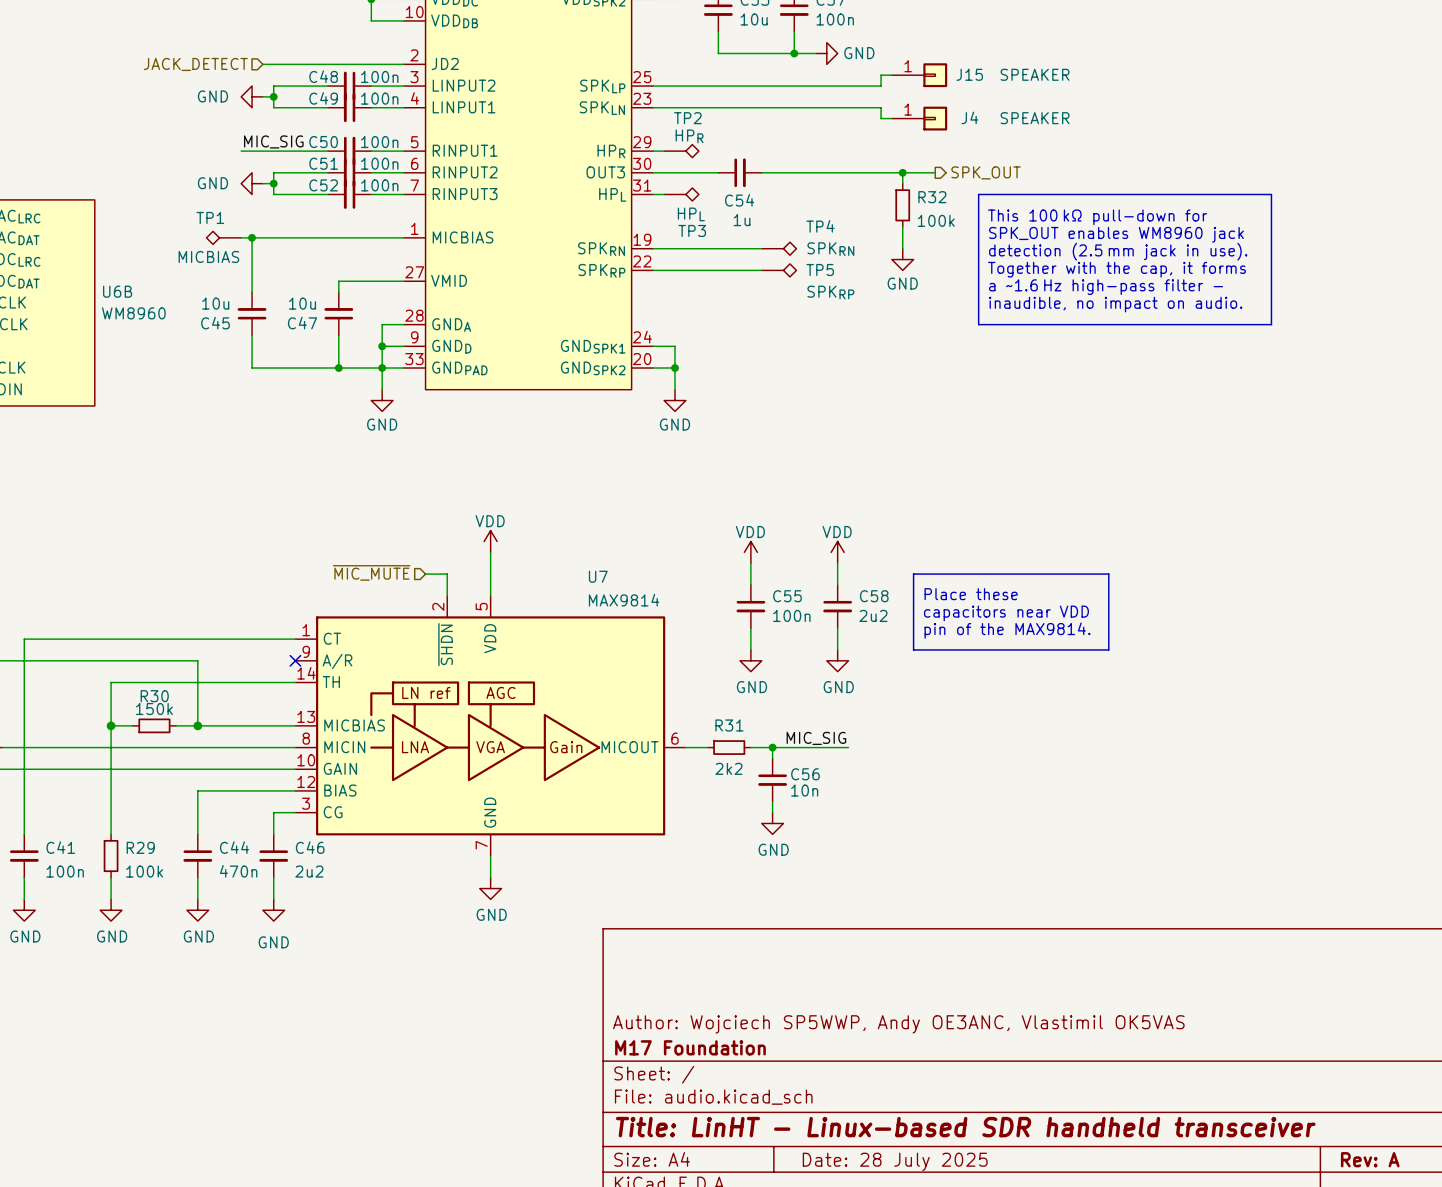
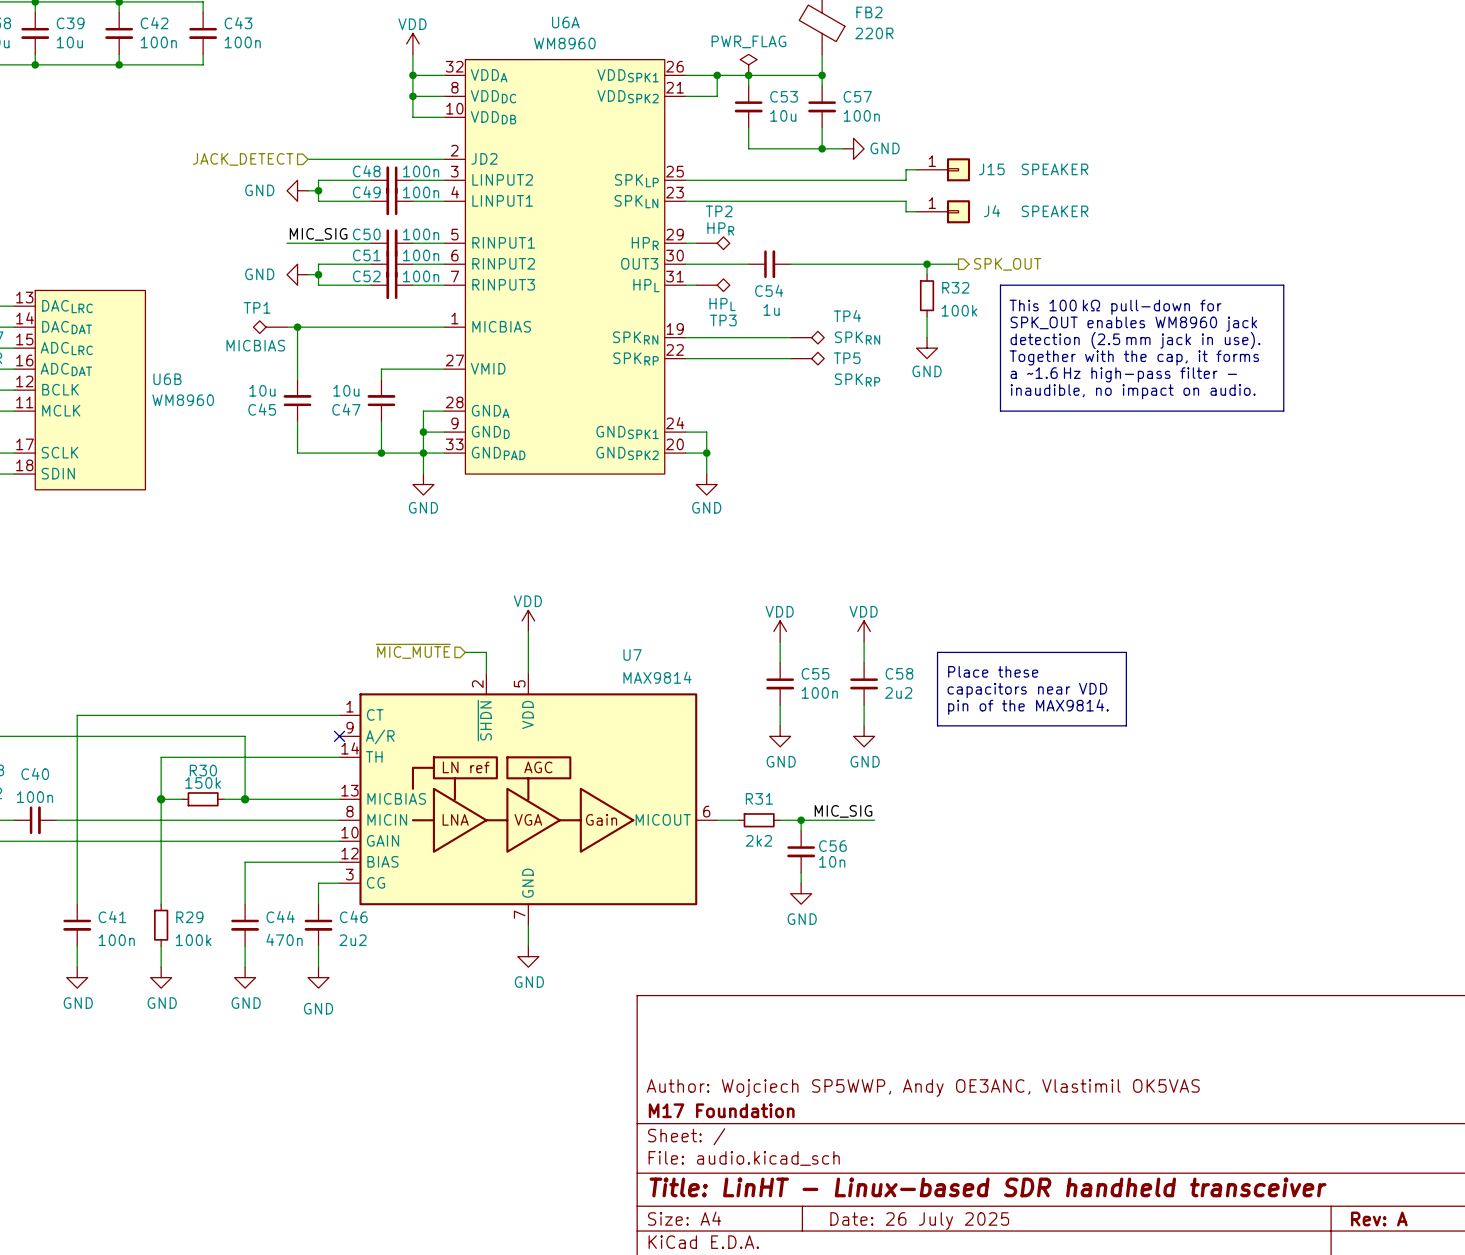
title block: Date: 28 July 2025 (895, 1161) -> Date: 26 July 2025 (919, 1221)

